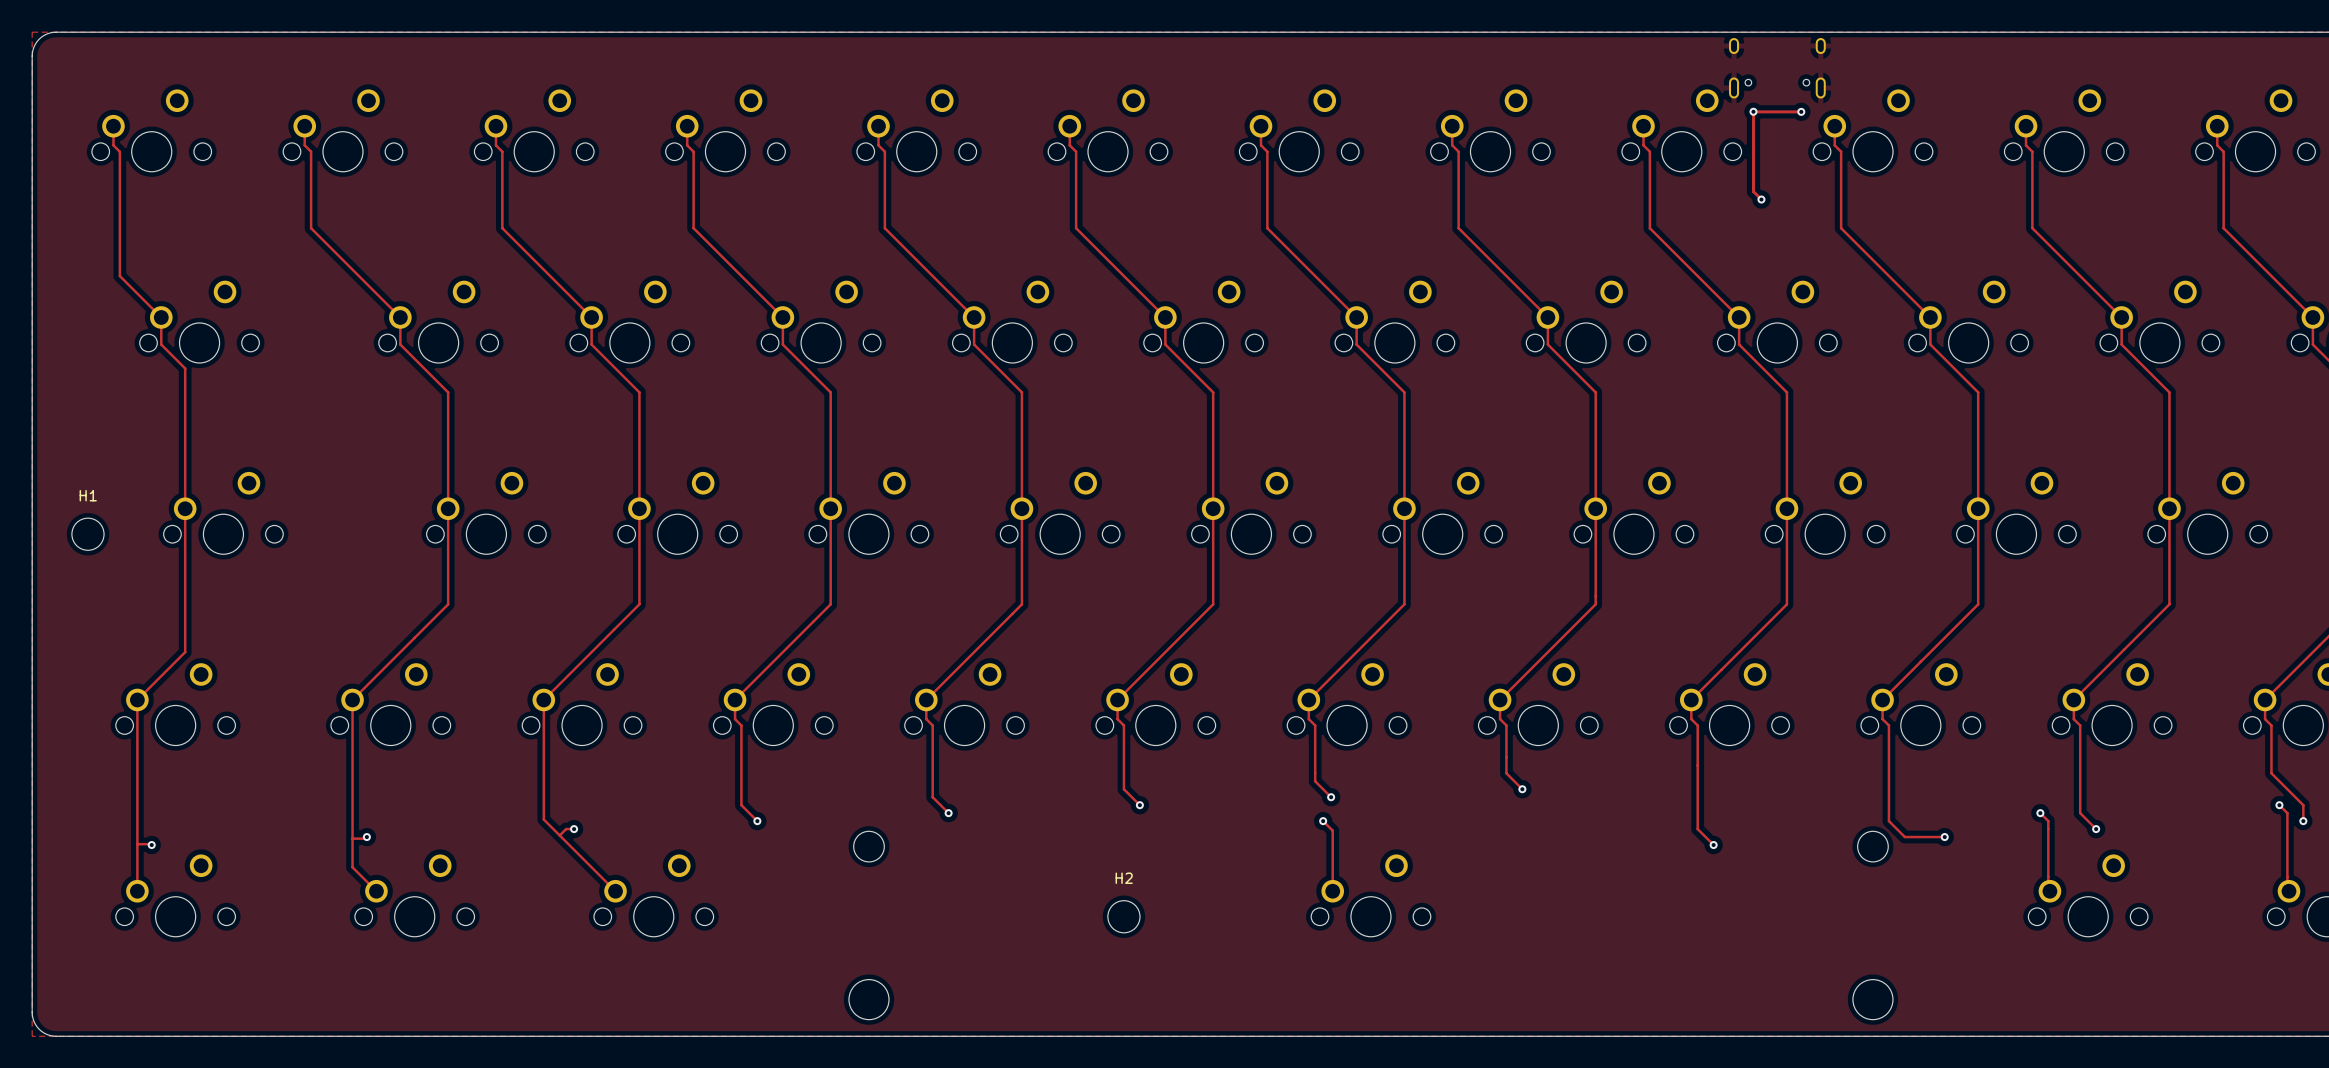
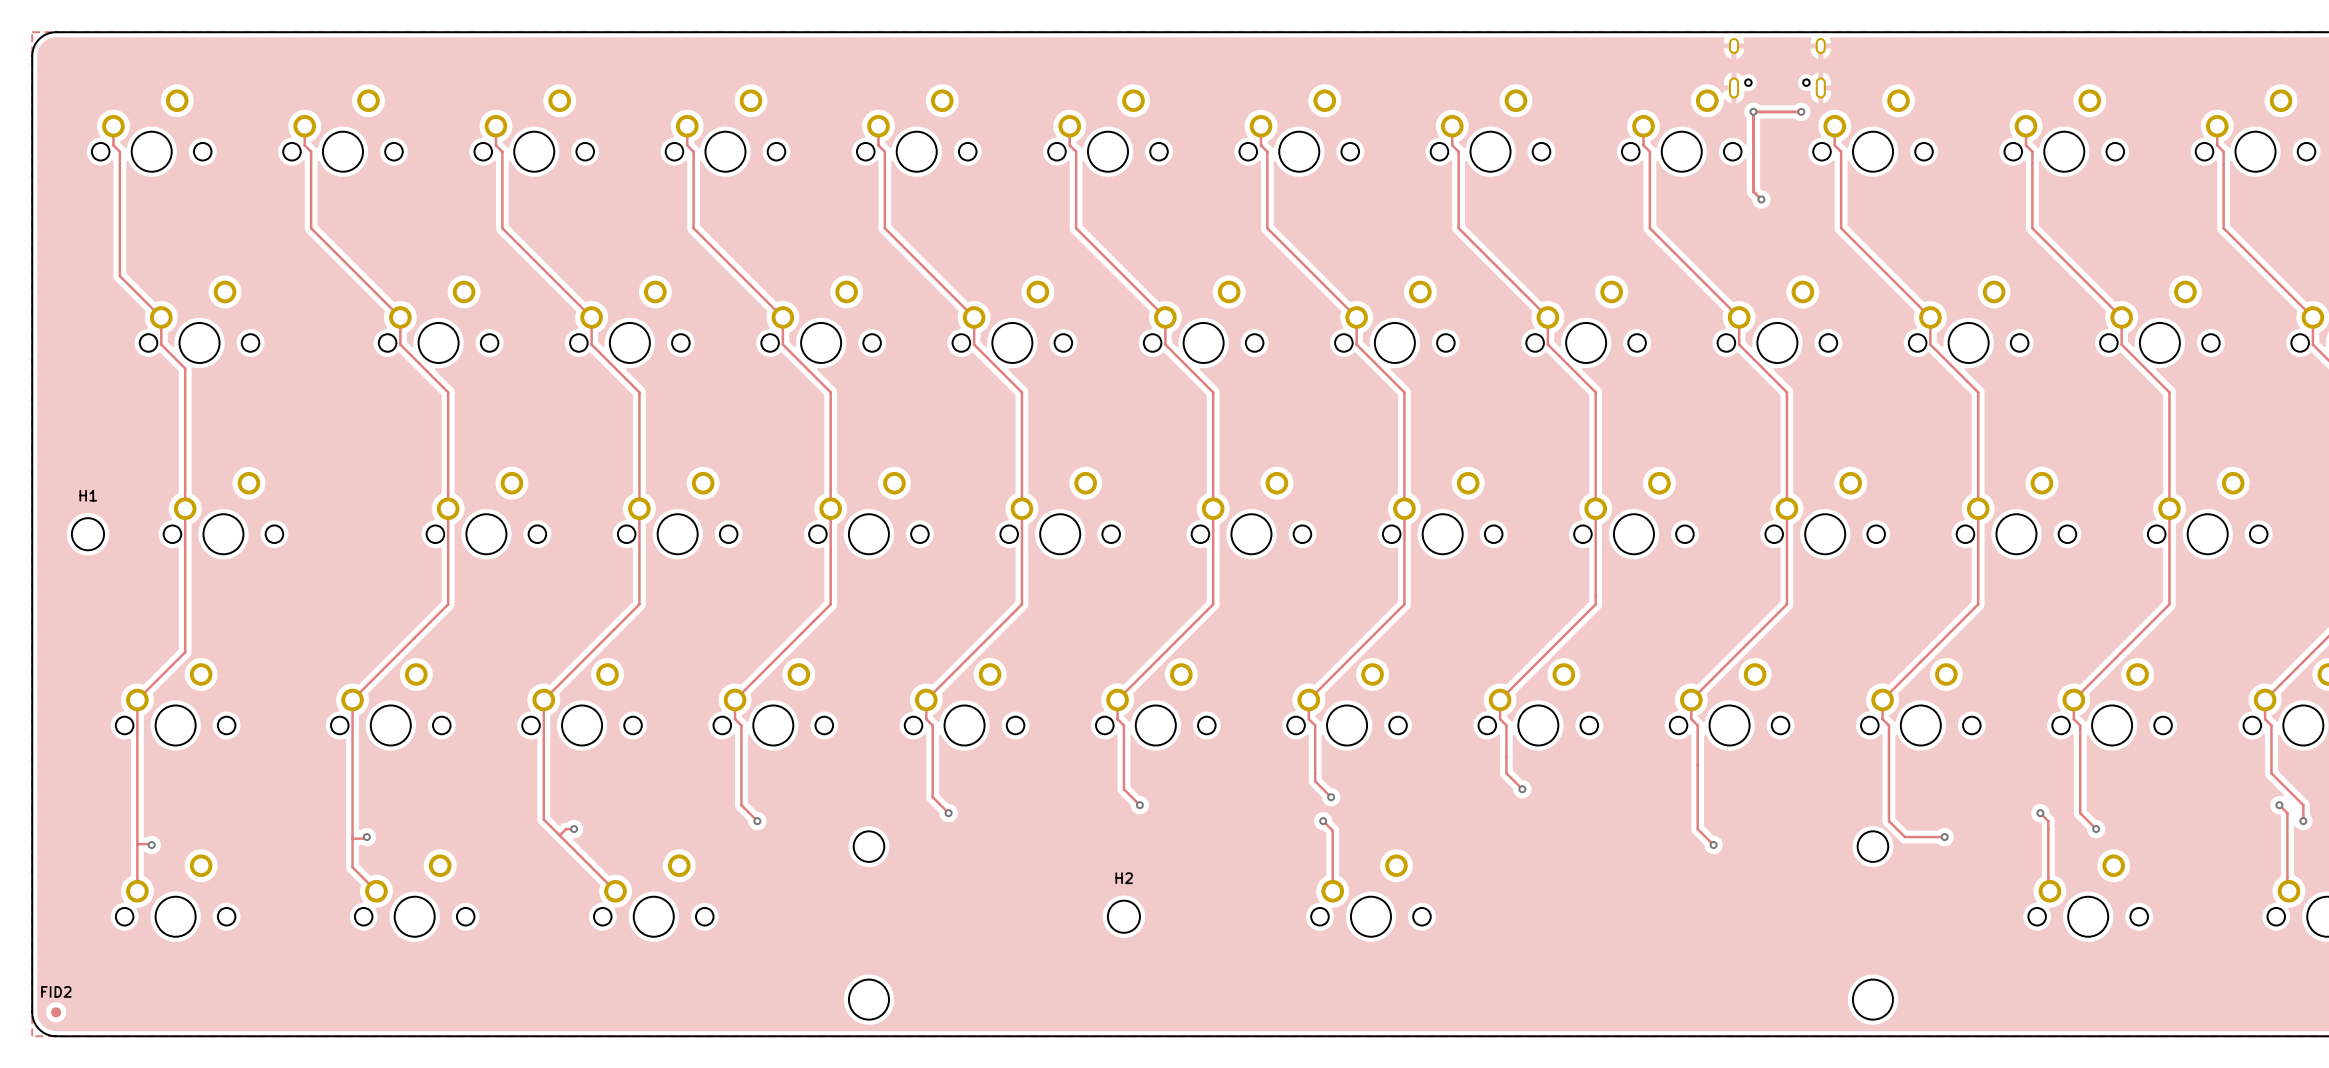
FID2: none -> (56, 1012)

